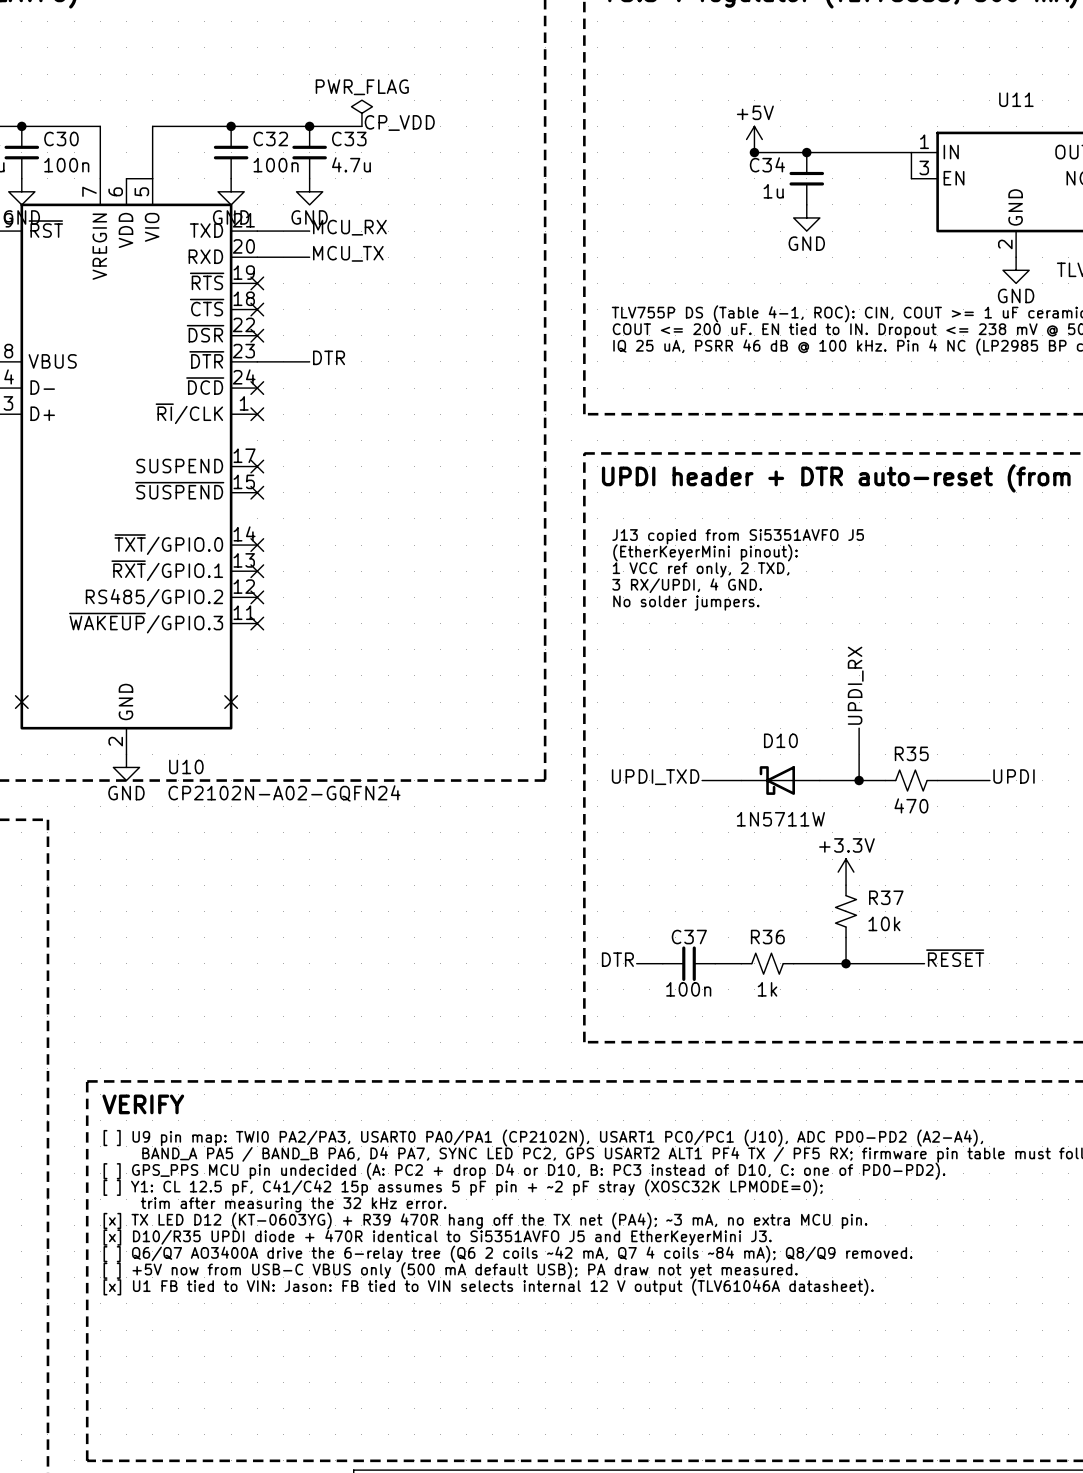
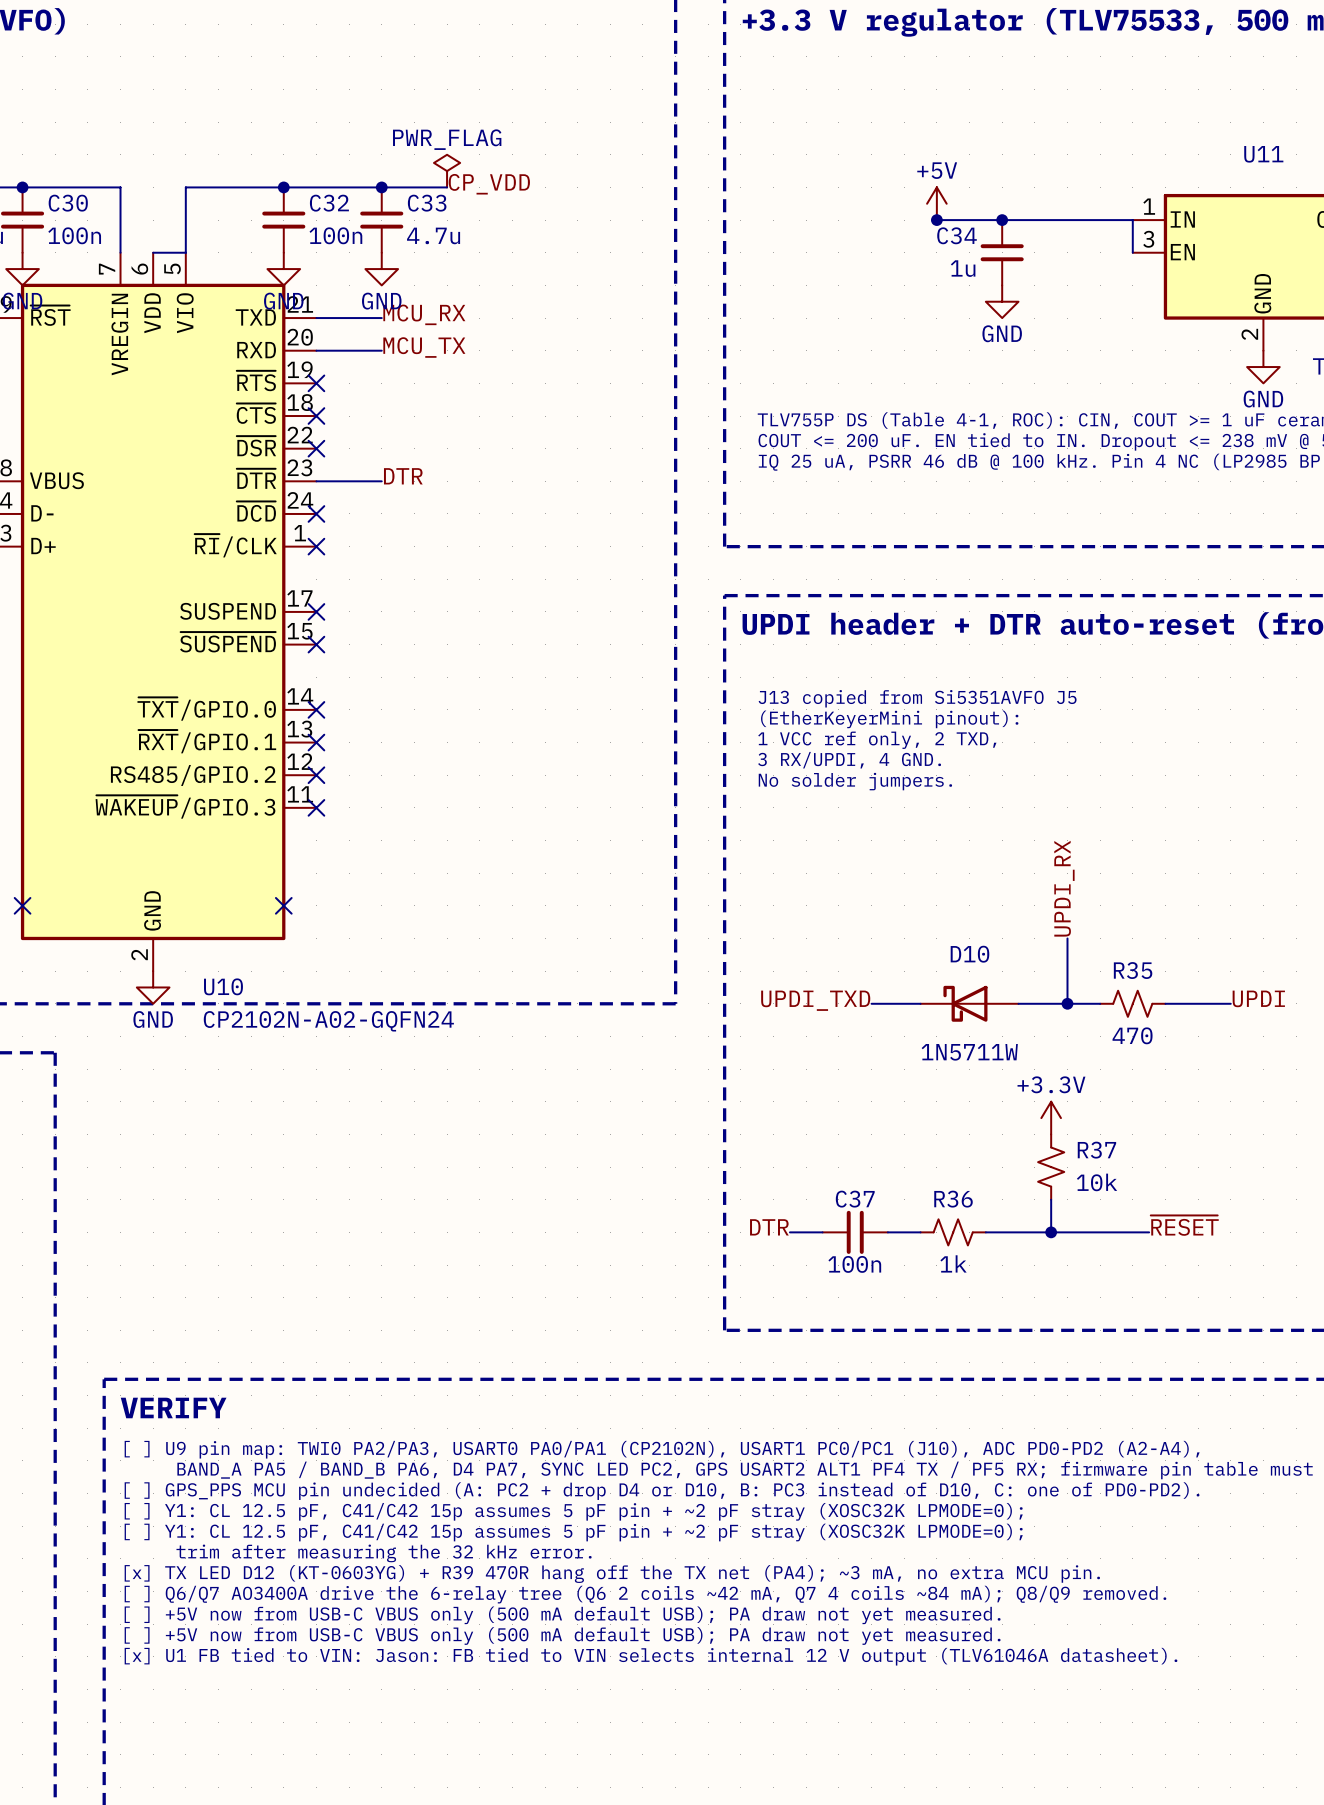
text: trim after measuring the 32 kHz error. (293, 1204) -> [ ] Y1: CL 12.5 pF, C41/C42 15p assumes 5 pF pin + ~2 pF stray (XOSC32K LPMODE=0); (573, 1532)
text: [x] TX LED D12 (KT-0603YG) + R39 470R hang off the TX net (PA4); ~3 mA, no extra MCU pin. (485, 1220) -> trim after measuring the 32 kHz error. (384, 1553)
text: [x] D10/R35 UPDI diode + 470R identical to Si5351AVFO J5 and EtherKeyerMini J3. (437, 1237) -> [x] TX LED D12 (KT-0603YG) + R39 470R hang off the TX net (PA4); ~3 mA, no extra MCU pin. (612, 1574)
text: [x] U1 FB tied to VIN: Jason: FB tied to VIN selects internal 12 V output (TLV61046A datasheet). (488, 1287) -> [ ] +5V now from USB-C VBUS only (500 mA default USB); PA draw not yet measured. (562, 1636)
text: none -> [x] U1 FB tied to VIN: Jason: FB tied to VIN selects internal 12 V output (TLV61046A datasheet). (650, 1656)

